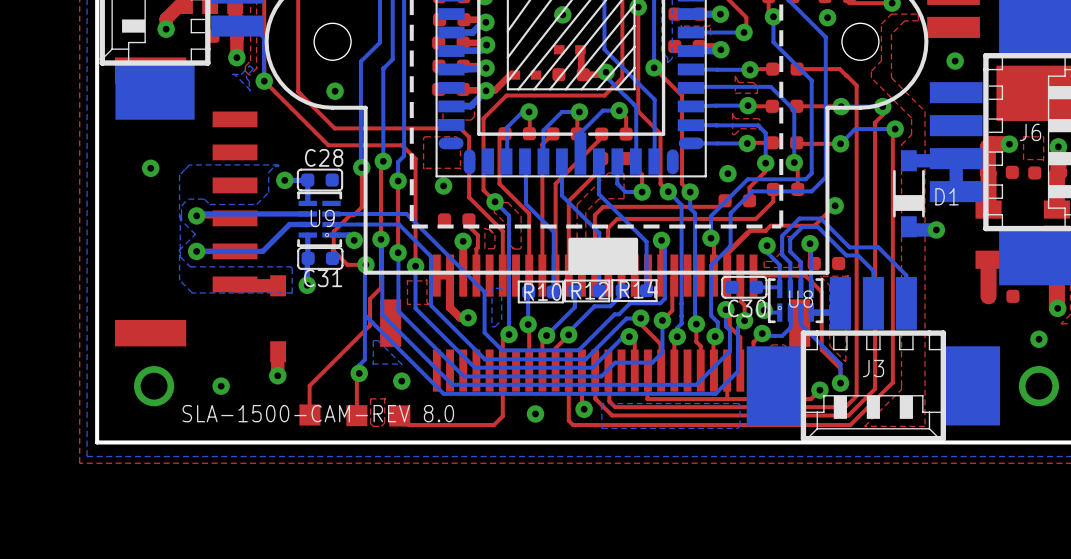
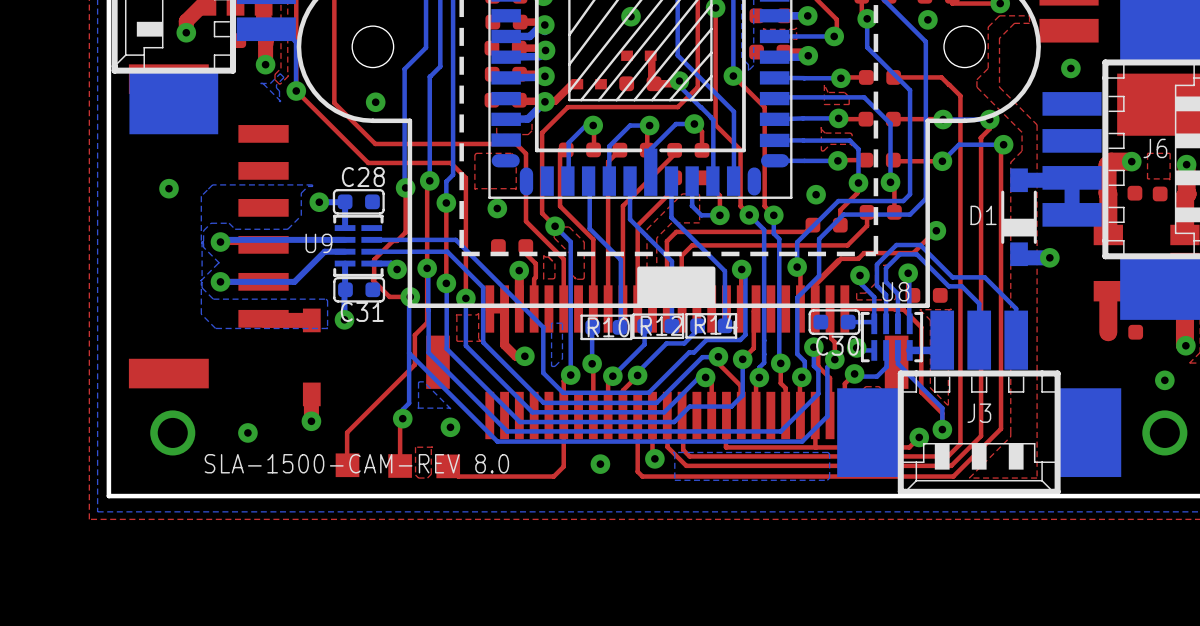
U9 footprint: [297, 191, 343, 247] -> [333, 214, 384, 277]
D1 name position: D1 (946, 196) -> D1 (983, 215)
U9 name position: U9 (322, 218) -> U9 (318, 243)
U8 footprint: [767, 278, 824, 324] -> [860, 311, 924, 363]
U8 name position: U8 (801, 299) -> U8 (895, 291)

